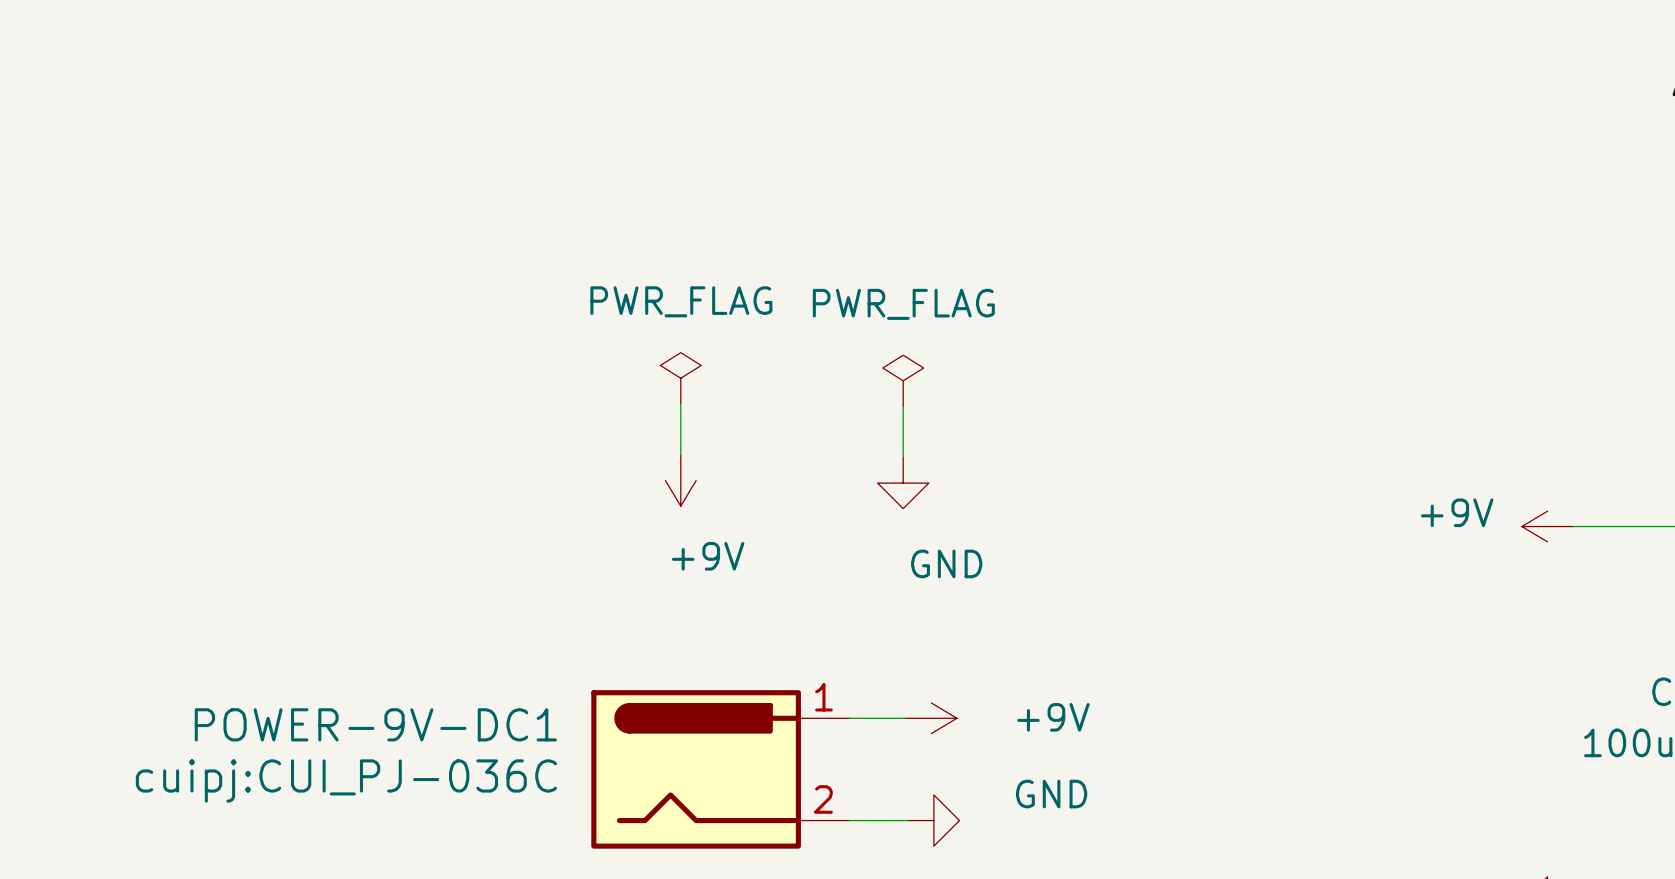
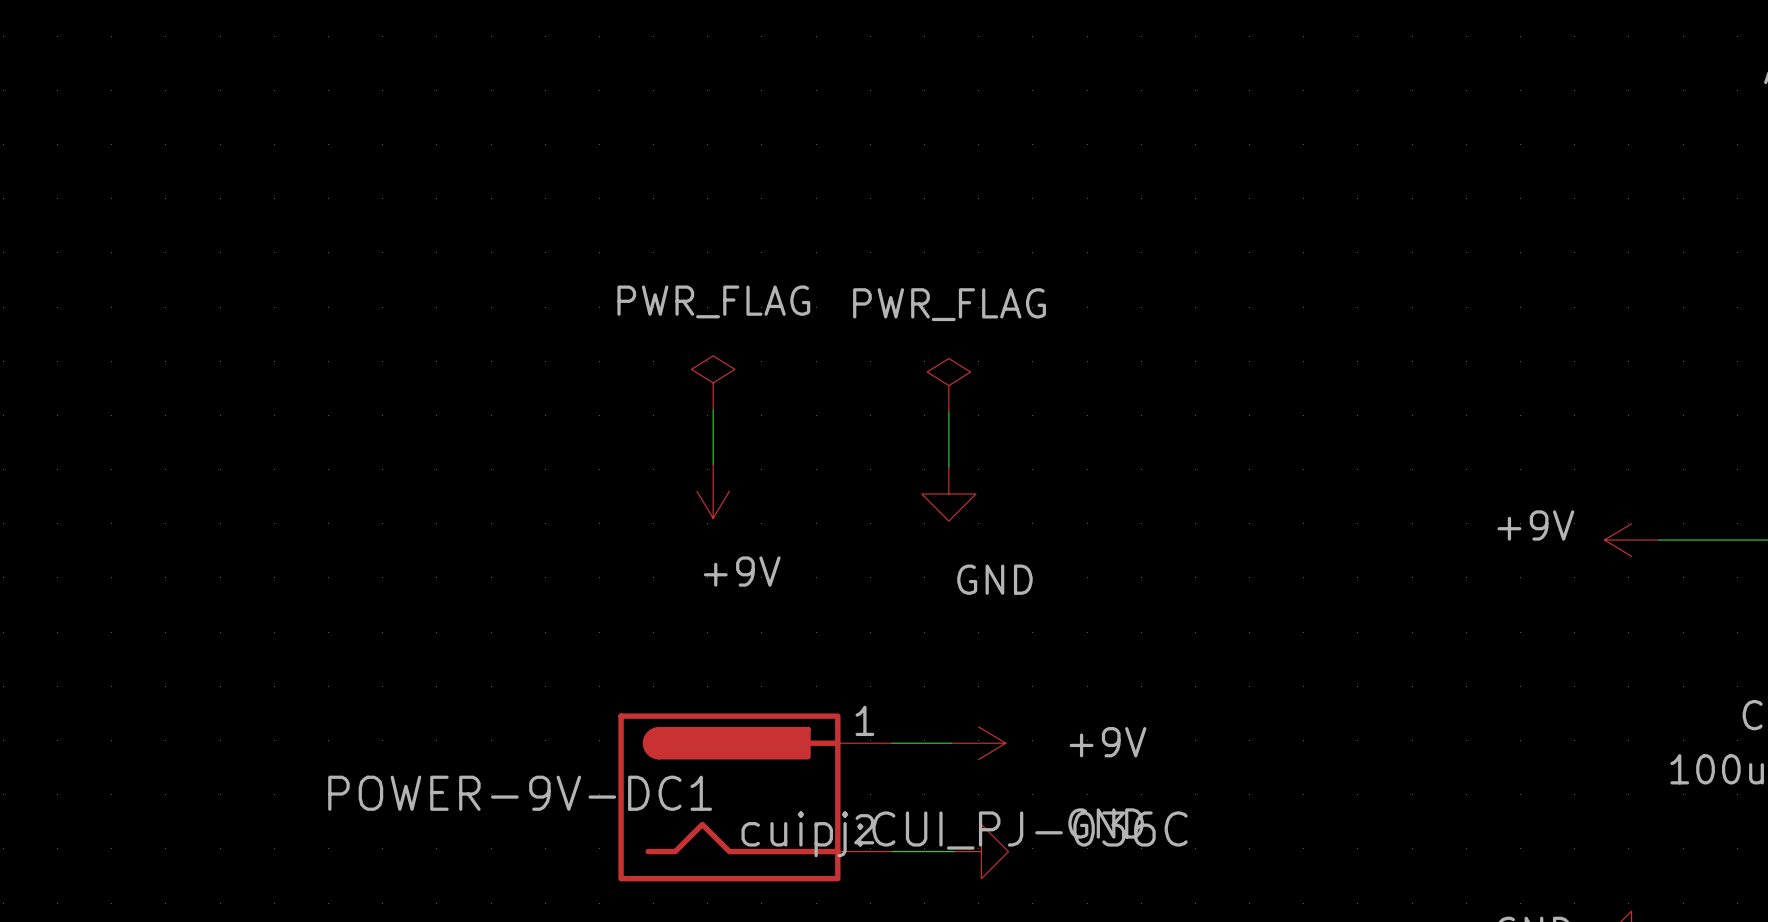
POWER-9V-DC1 name position: POWER-9V-DC1 (375, 724) -> POWER-9V-DC1 (520, 793)
POWER-9V-DC1 value position: cuipj:CUI_PJ-036C (346, 780) -> cuipj:CUI_PJ-036C (964, 834)

